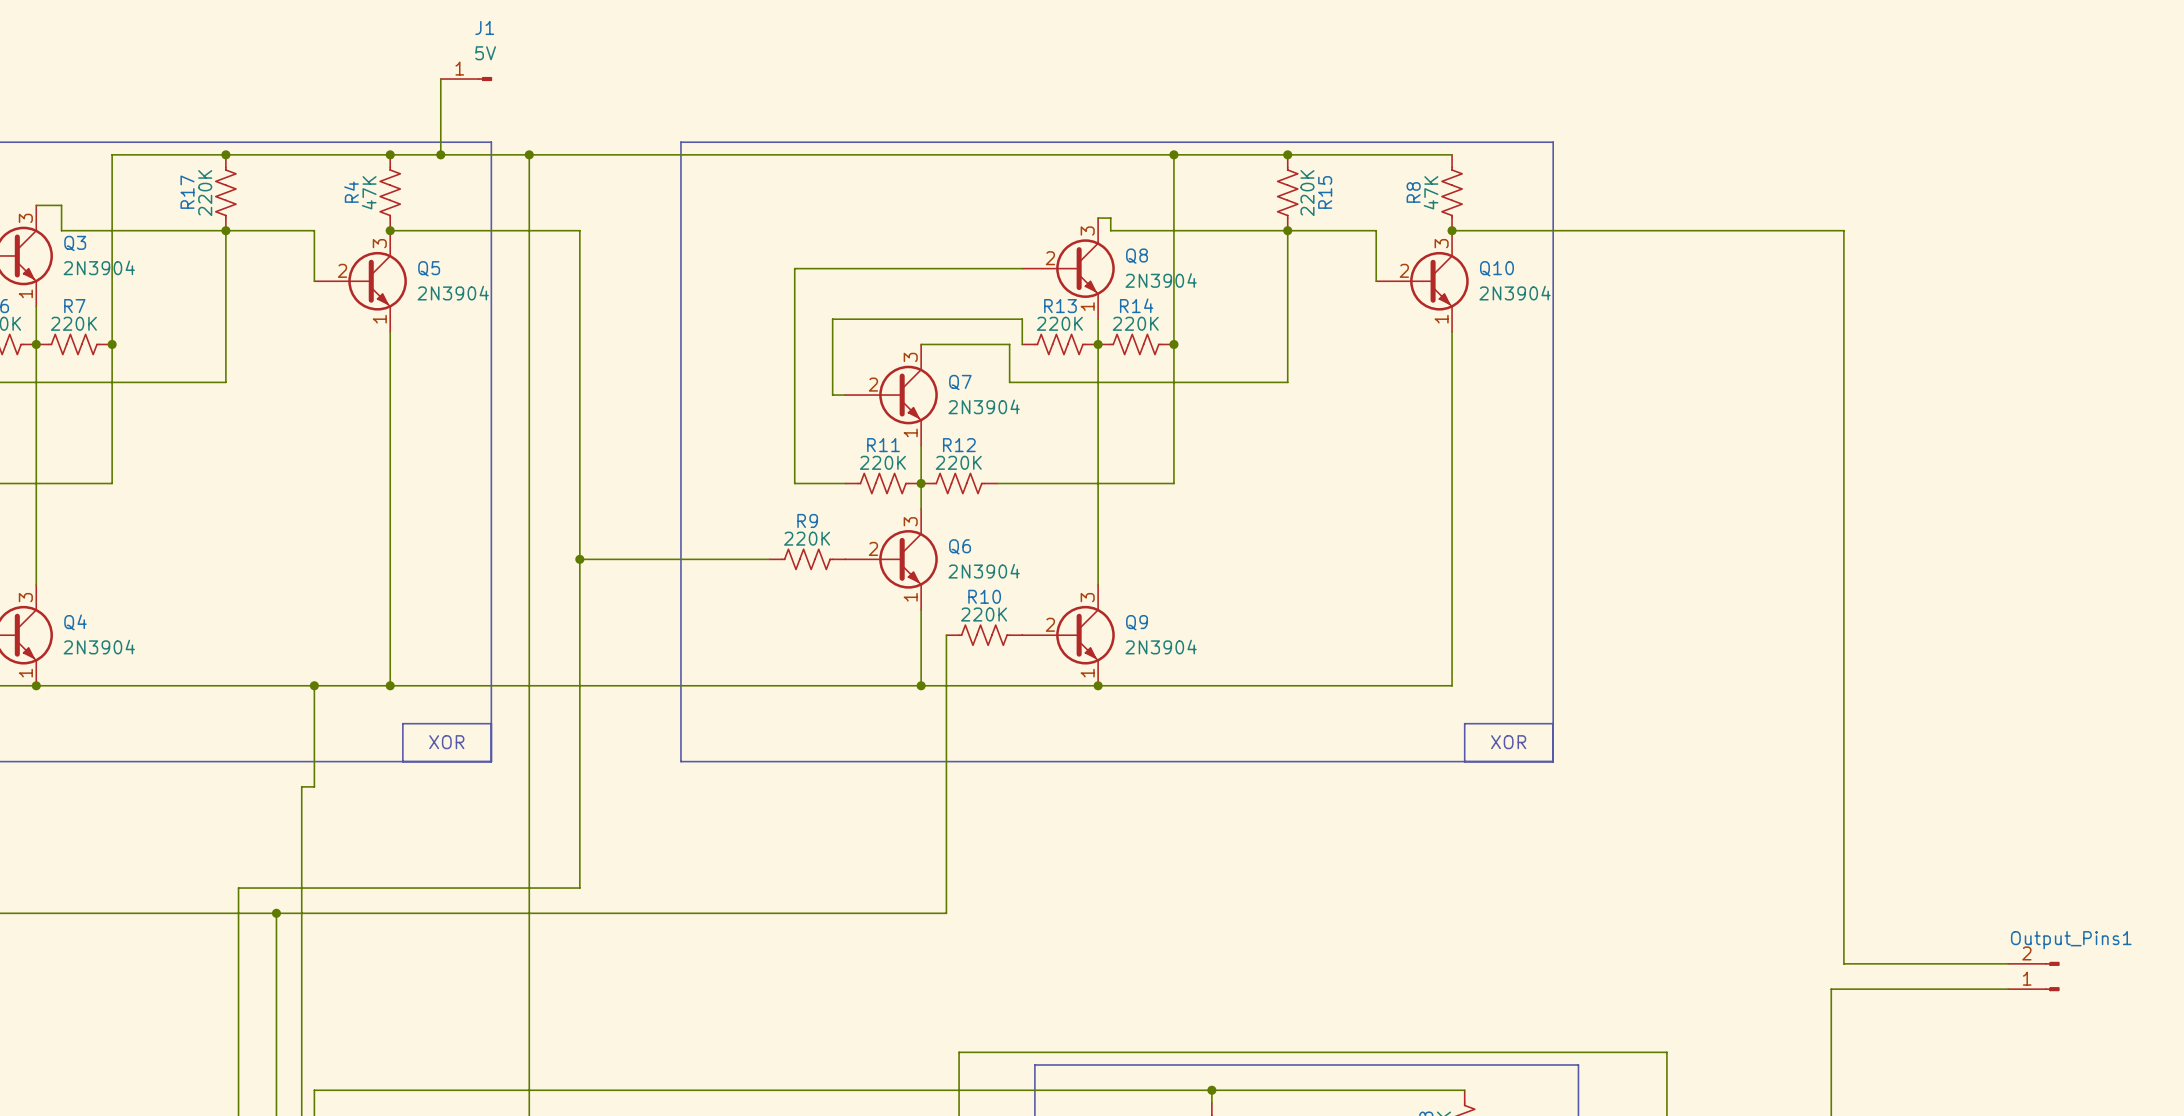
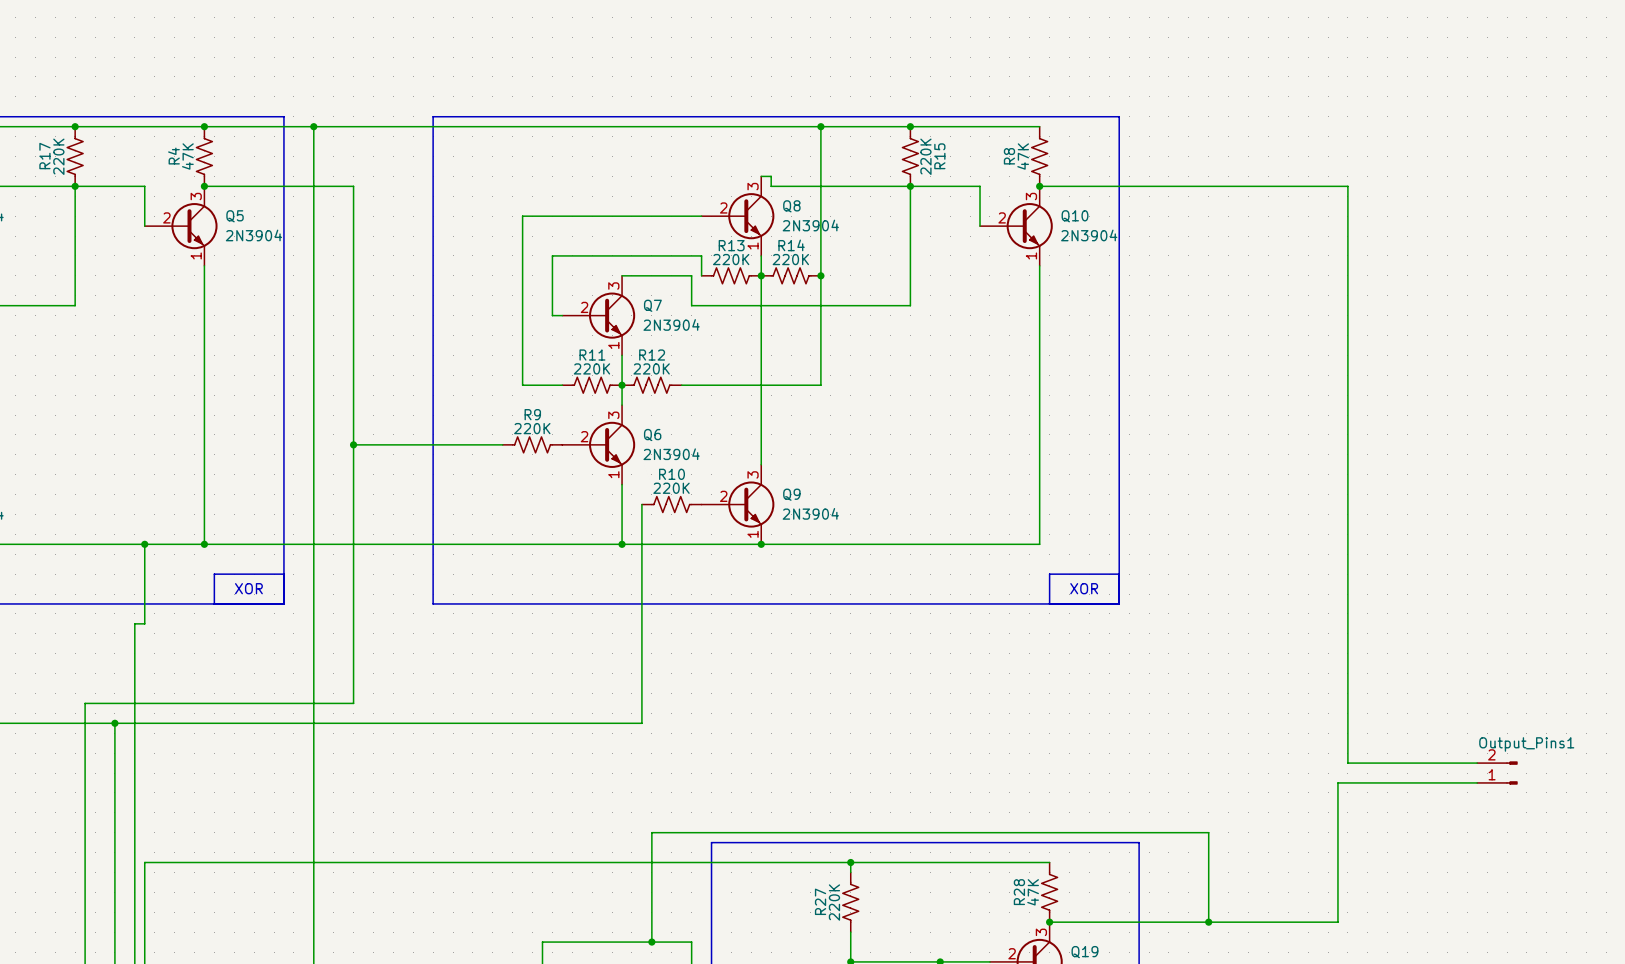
wire: (440, 79) (440, 154) -> none
J1: 5V (466, 79) -> none
junction: (440, 154) -> none

